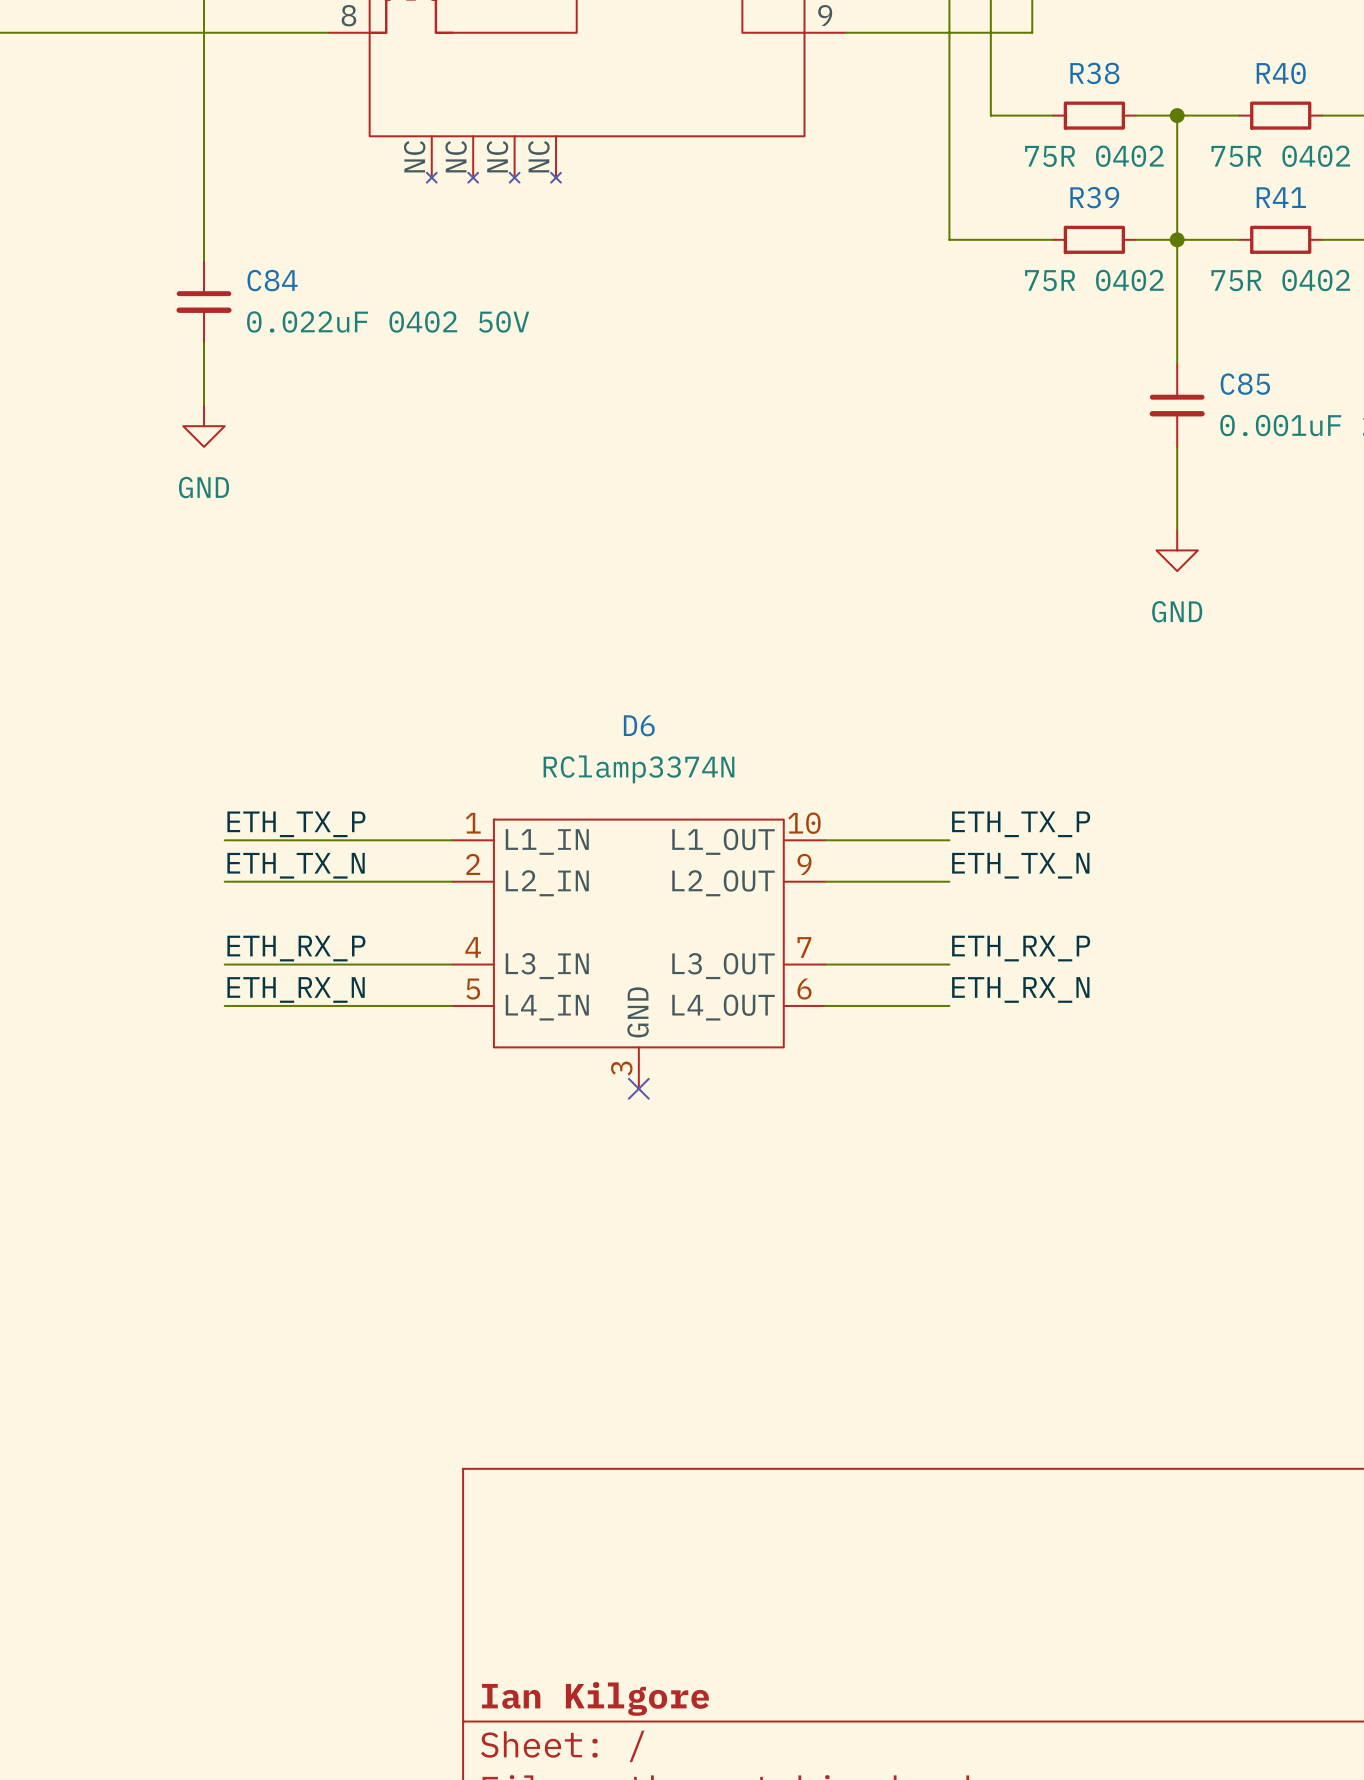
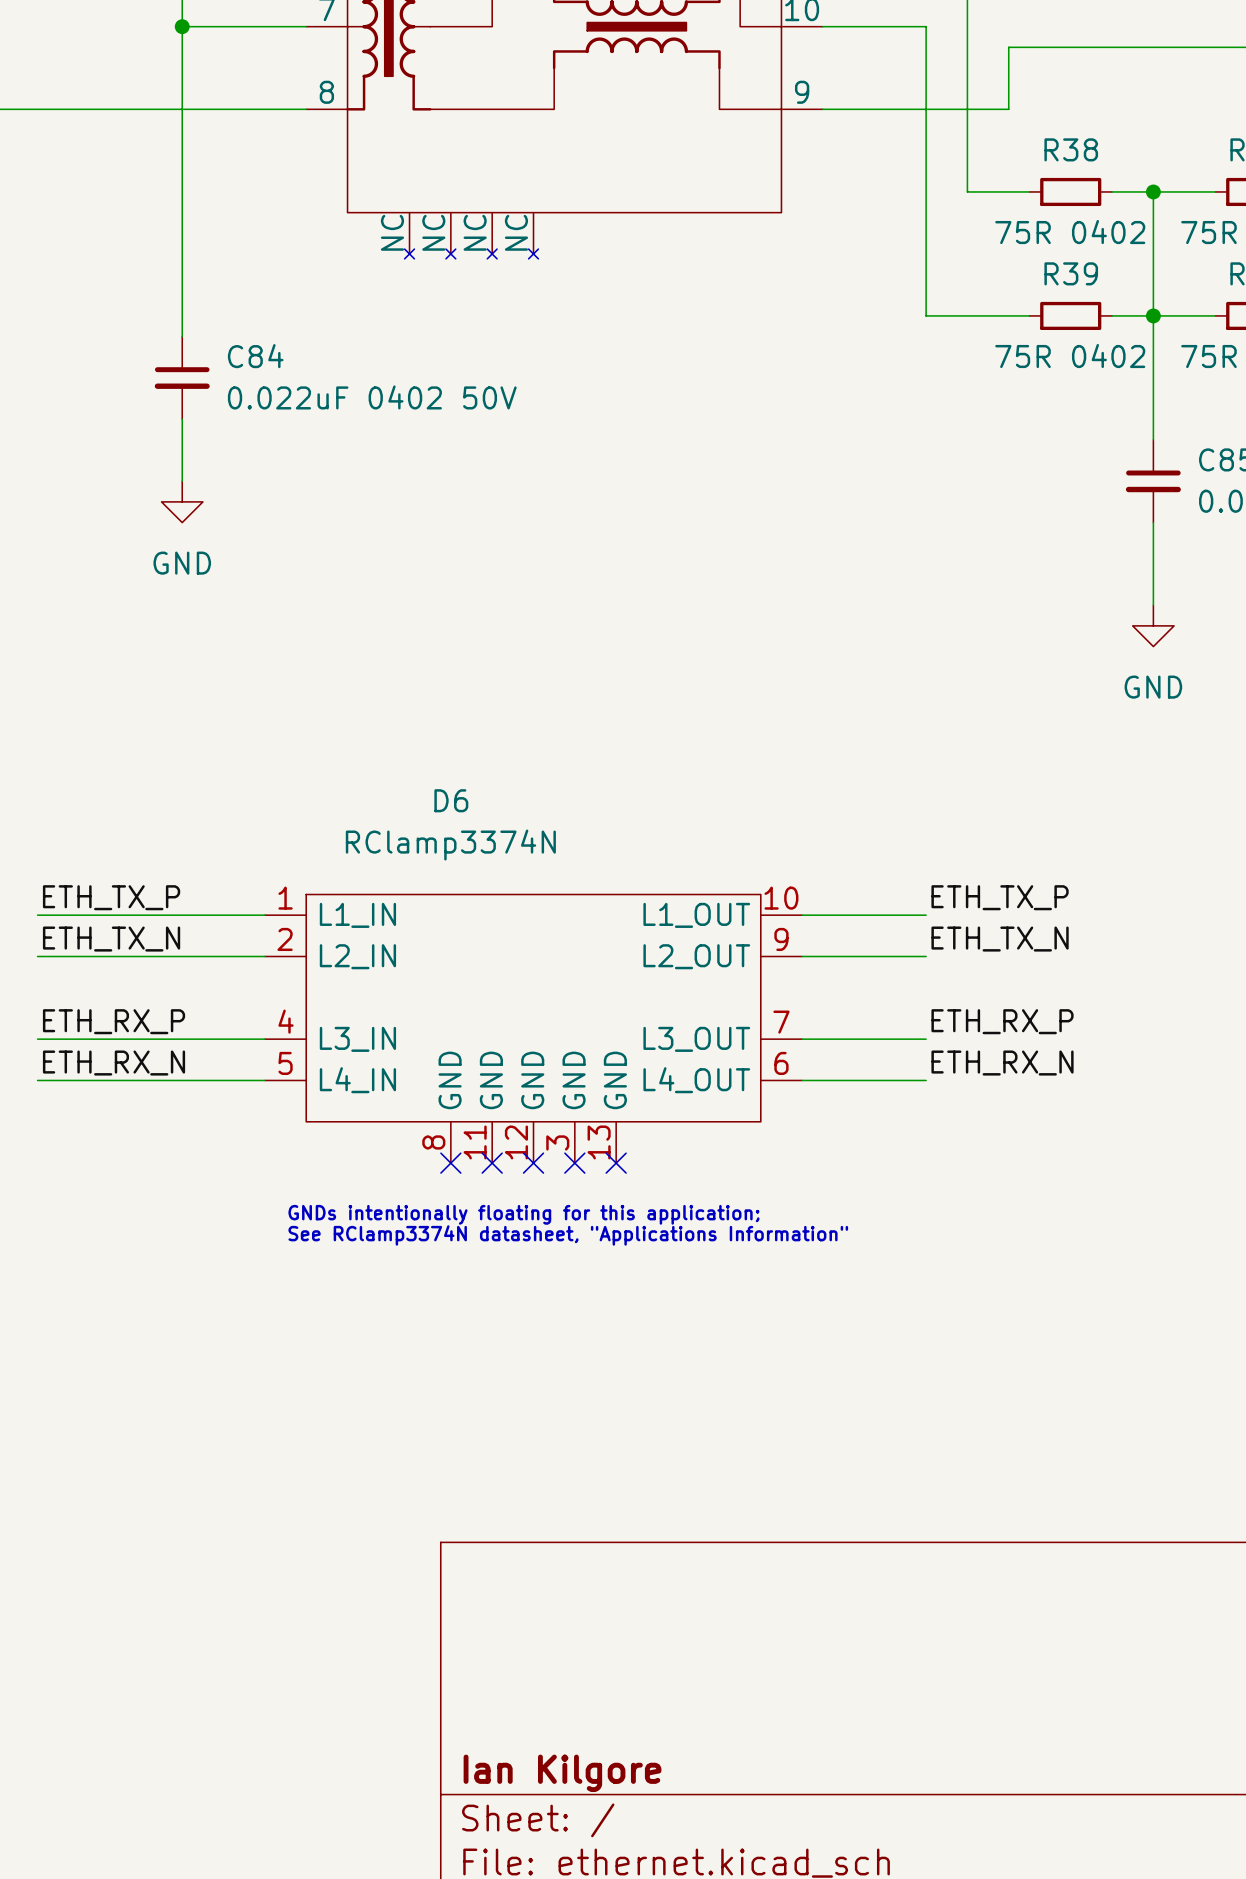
D6 name position: D6 (639, 725) -> D6 (451, 800)
D6 value position: RClamp3374N (638, 769) -> RClamp3374N (450, 845)
D6 symbol: [452, 819, 826, 1089] -> [264, 894, 803, 1164]
label position: ETH_TX_P (296, 824) -> ETH_TX_P (111, 897)
wire: (286, 840) (452, 840) -> (37, 915) (202, 915)
label position: ETH_TX_N (296, 865) -> ETH_TX_N (111, 939)
wire: (286, 881) (452, 881) -> (37, 956) (202, 956)
label position: ETH_RX_P (296, 948) -> ETH_RX_P (114, 1021)
wire: (286, 964) (452, 964) -> (37, 1039) (202, 1039)
label position: ETH_RX_N (296, 989) -> ETH_RX_N (114, 1063)
wire: (286, 1005) (452, 1005) -> (37, 1080) (202, 1080)
no-connect mark: none -> (450, 1163)
no-connect mark: none -> (492, 1163)
no-connect mark: none -> (533, 1163)
no-connect mark: none -> (574, 1163)
text: none -> GNDs intentionally floating for this application; (523, 1214)
text: none -> See RClamp3374N datasheet, "Applications Information" (568, 1235)

